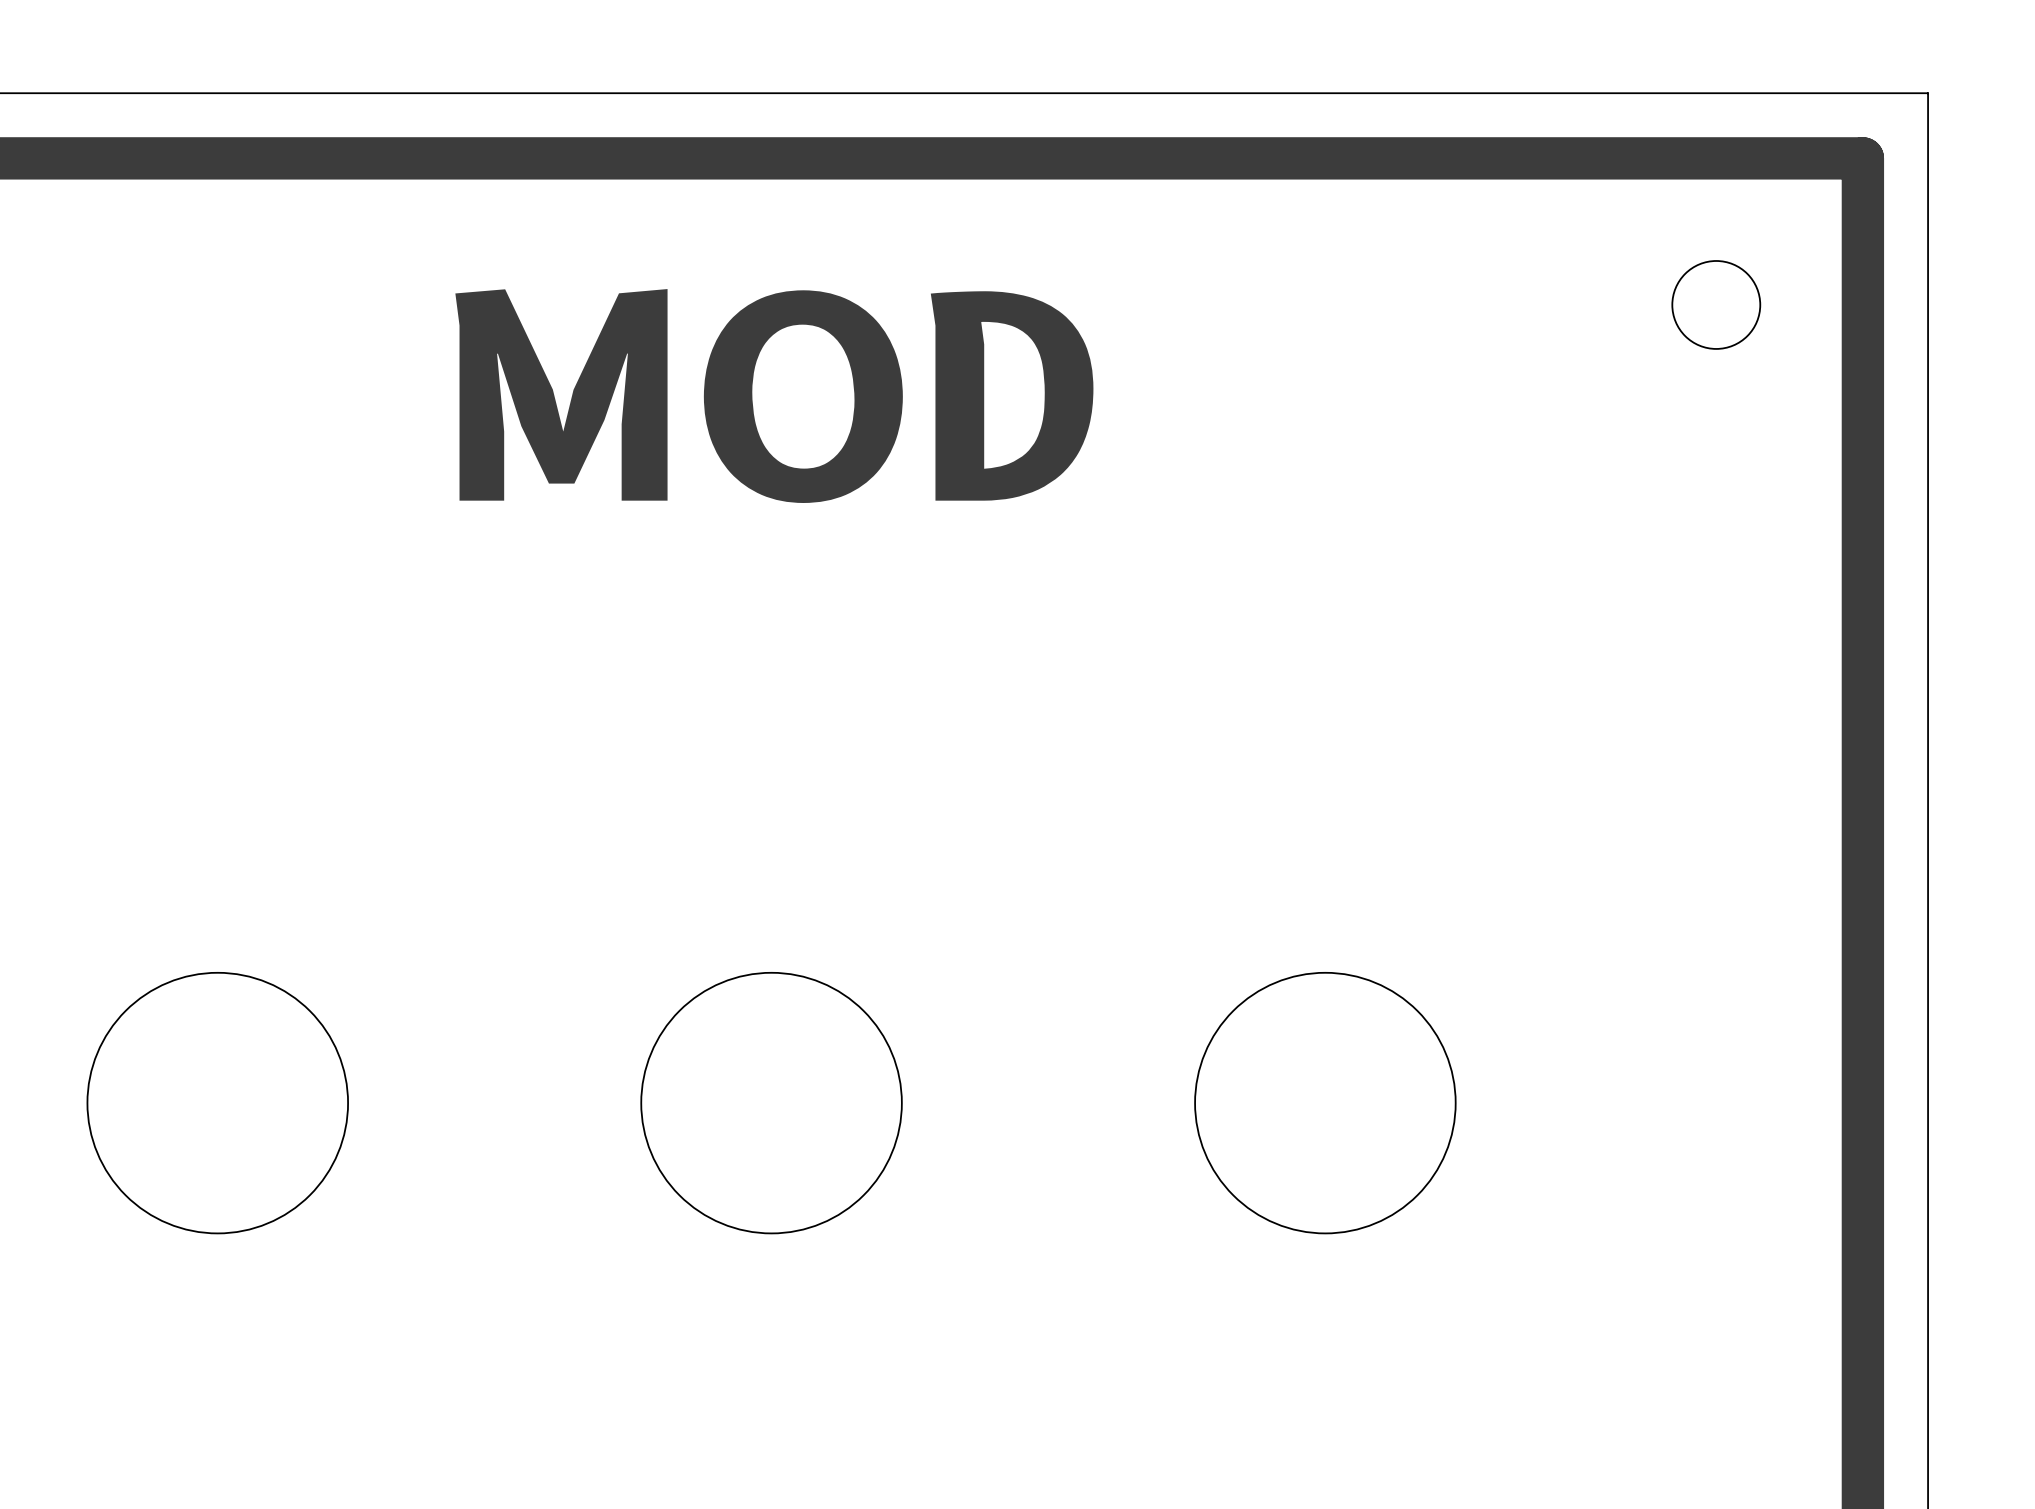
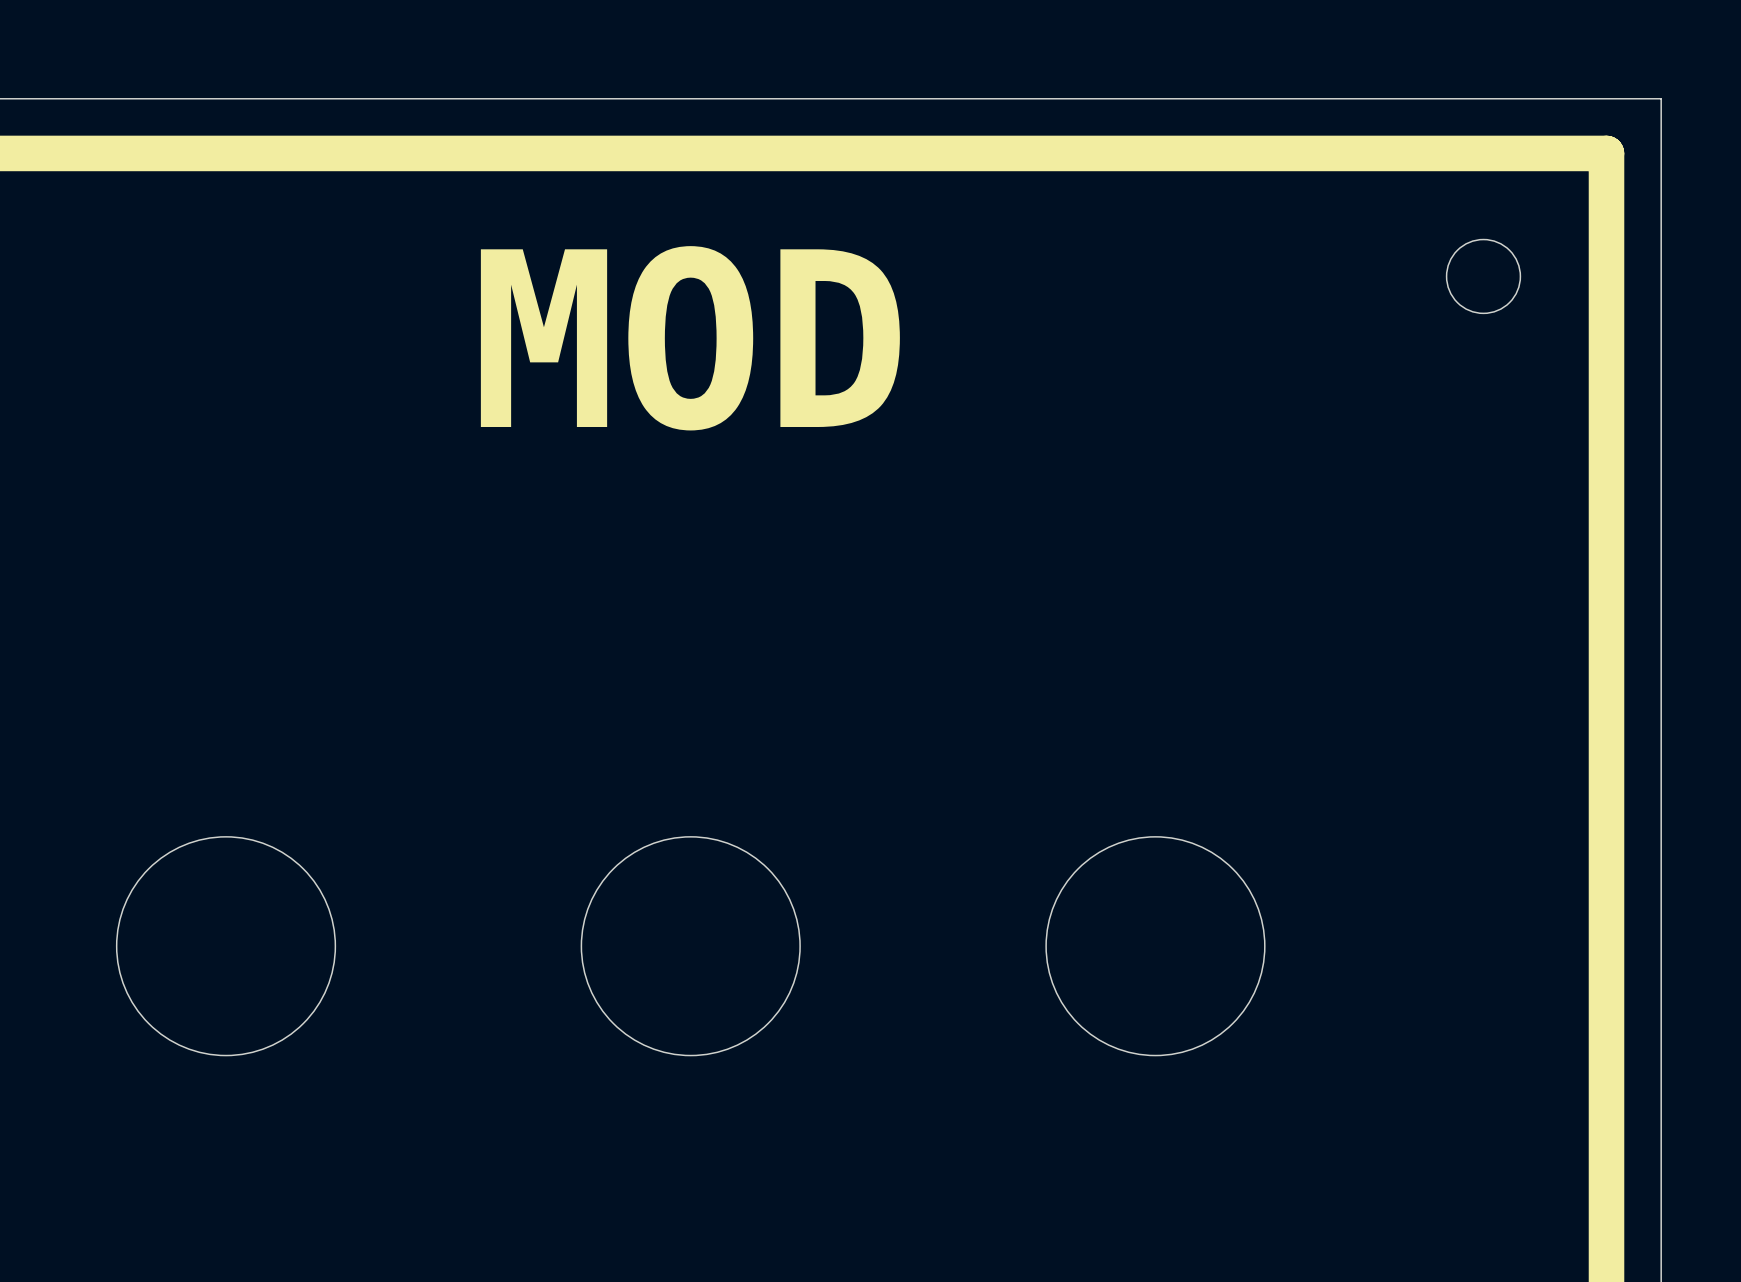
text position: MOD (774, 396) -> MOD (690, 338)

